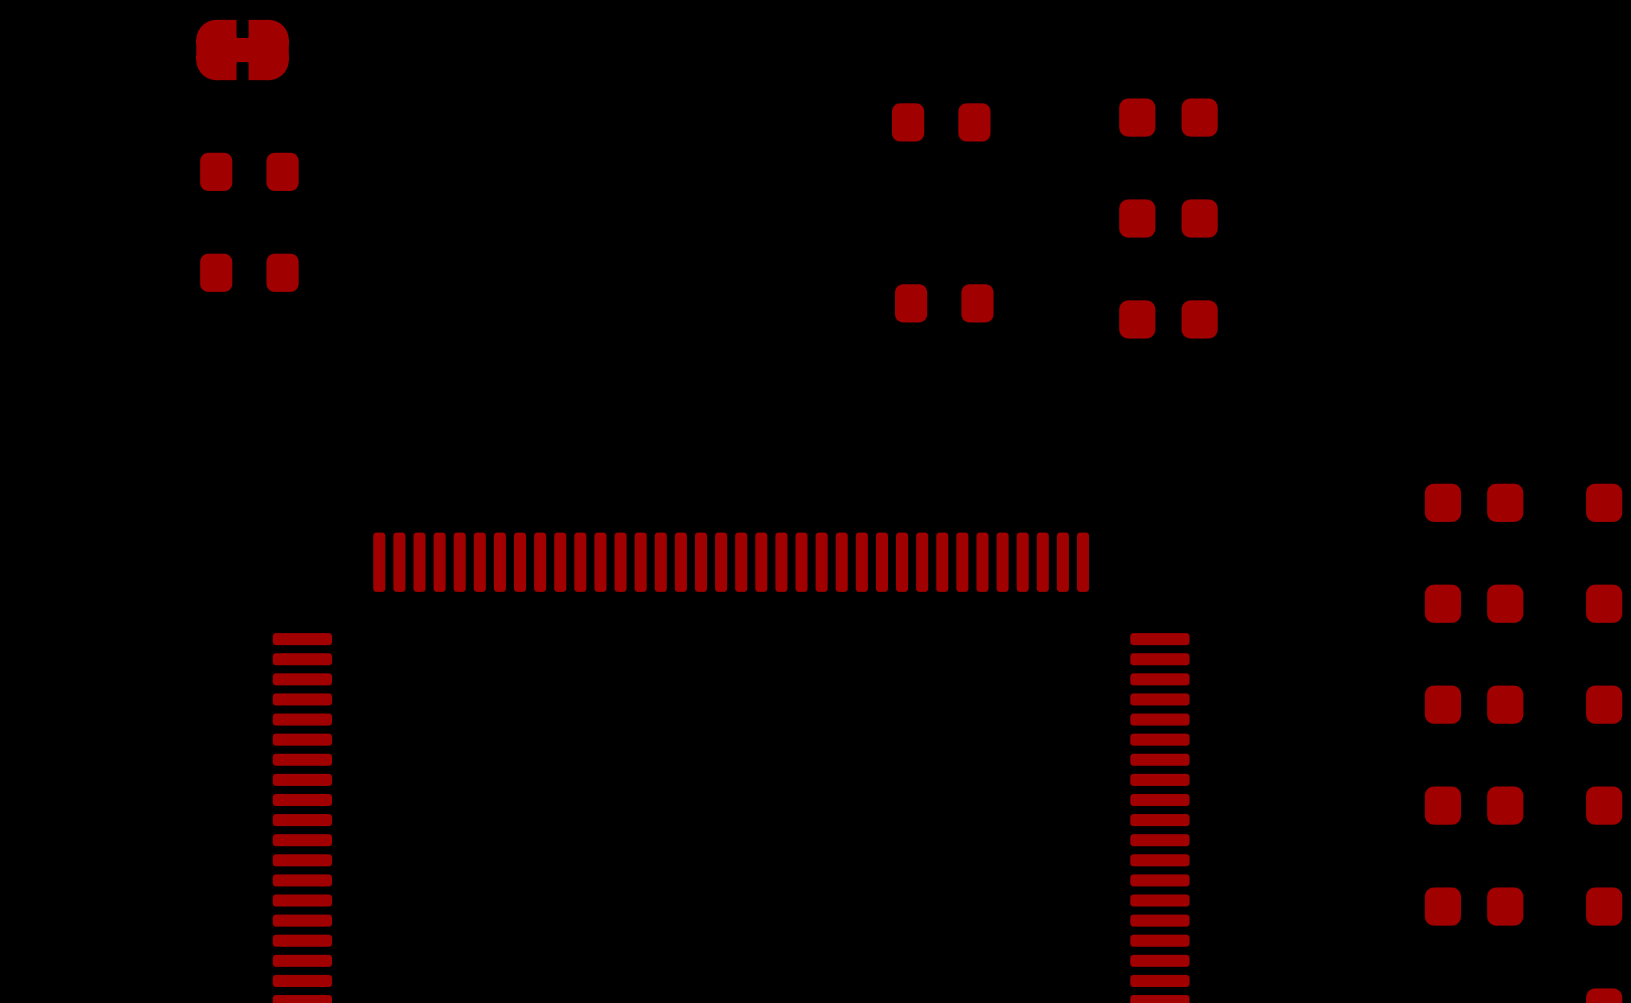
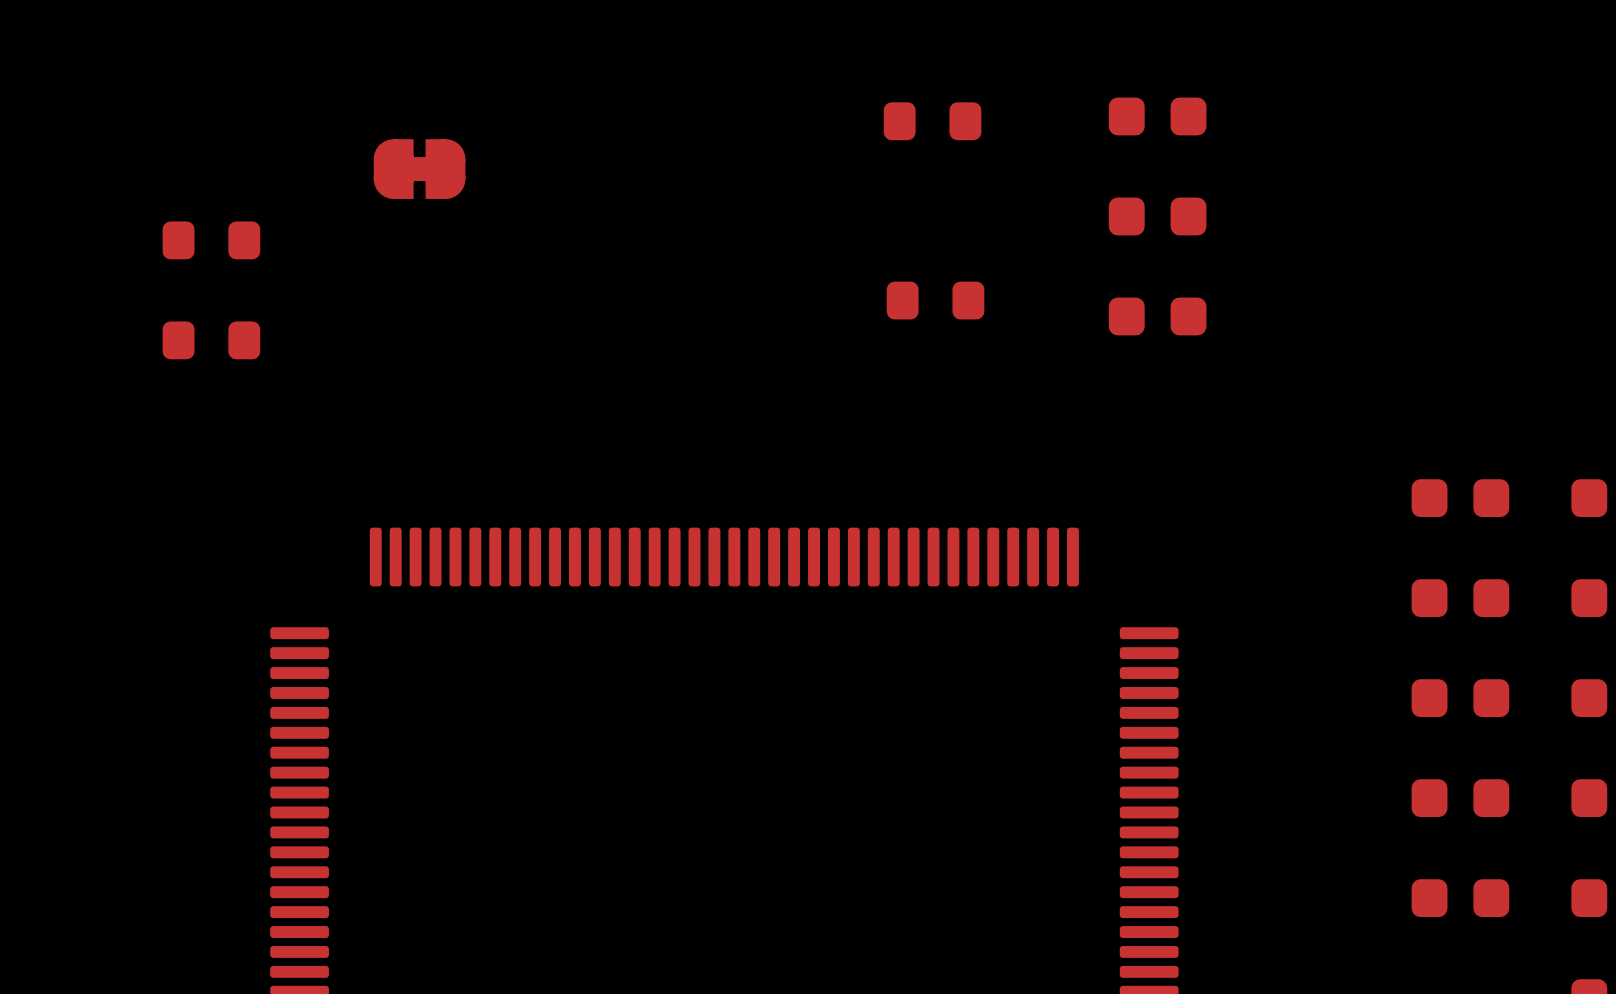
part position: (242, 50) -> (419, 169)
part: (249, 171) -> none
part: none -> (211, 240)
part: (249, 272) -> none
part: none -> (211, 340)

